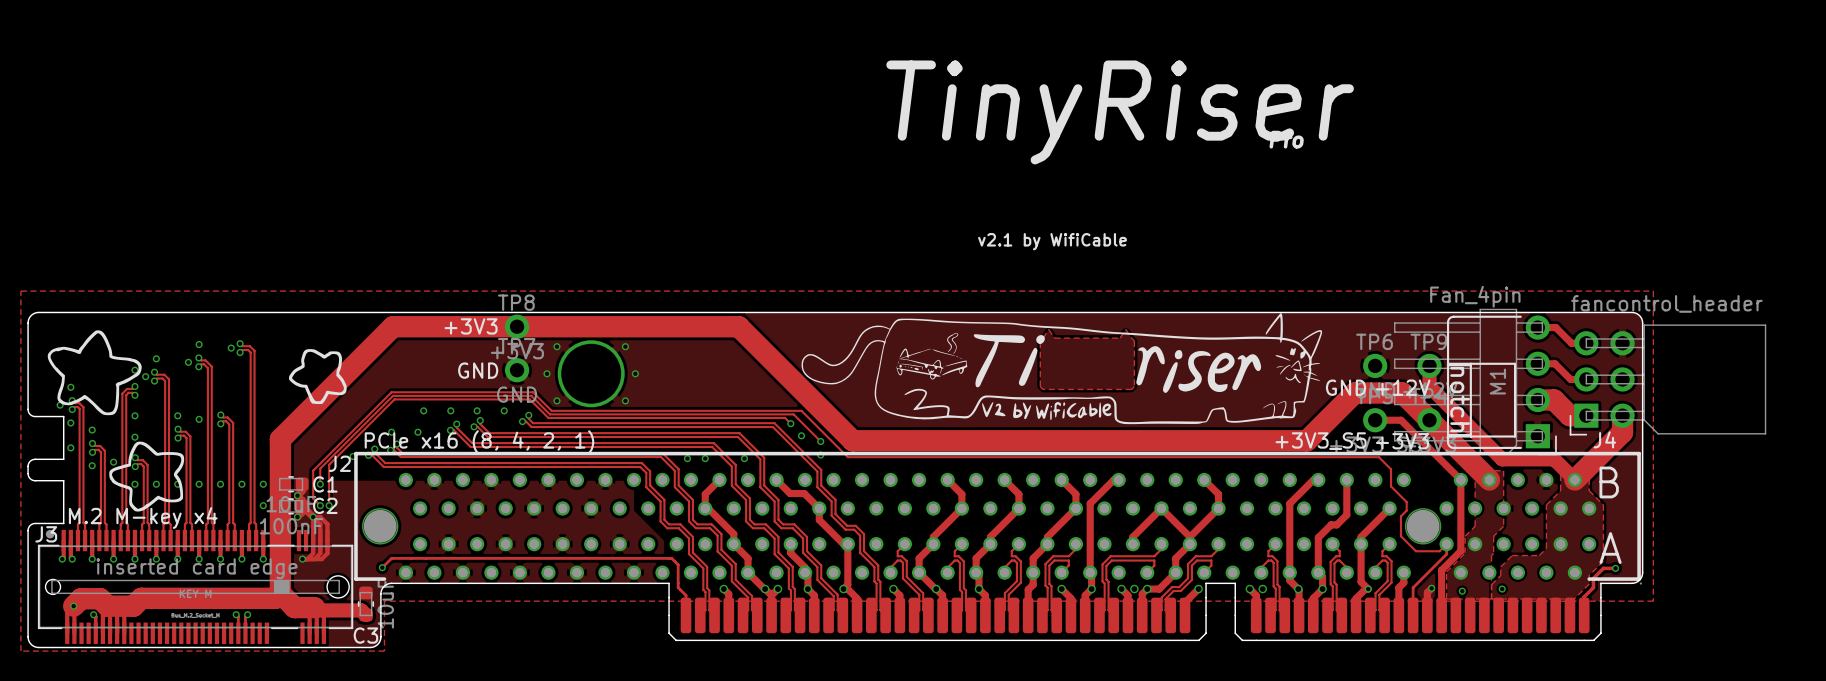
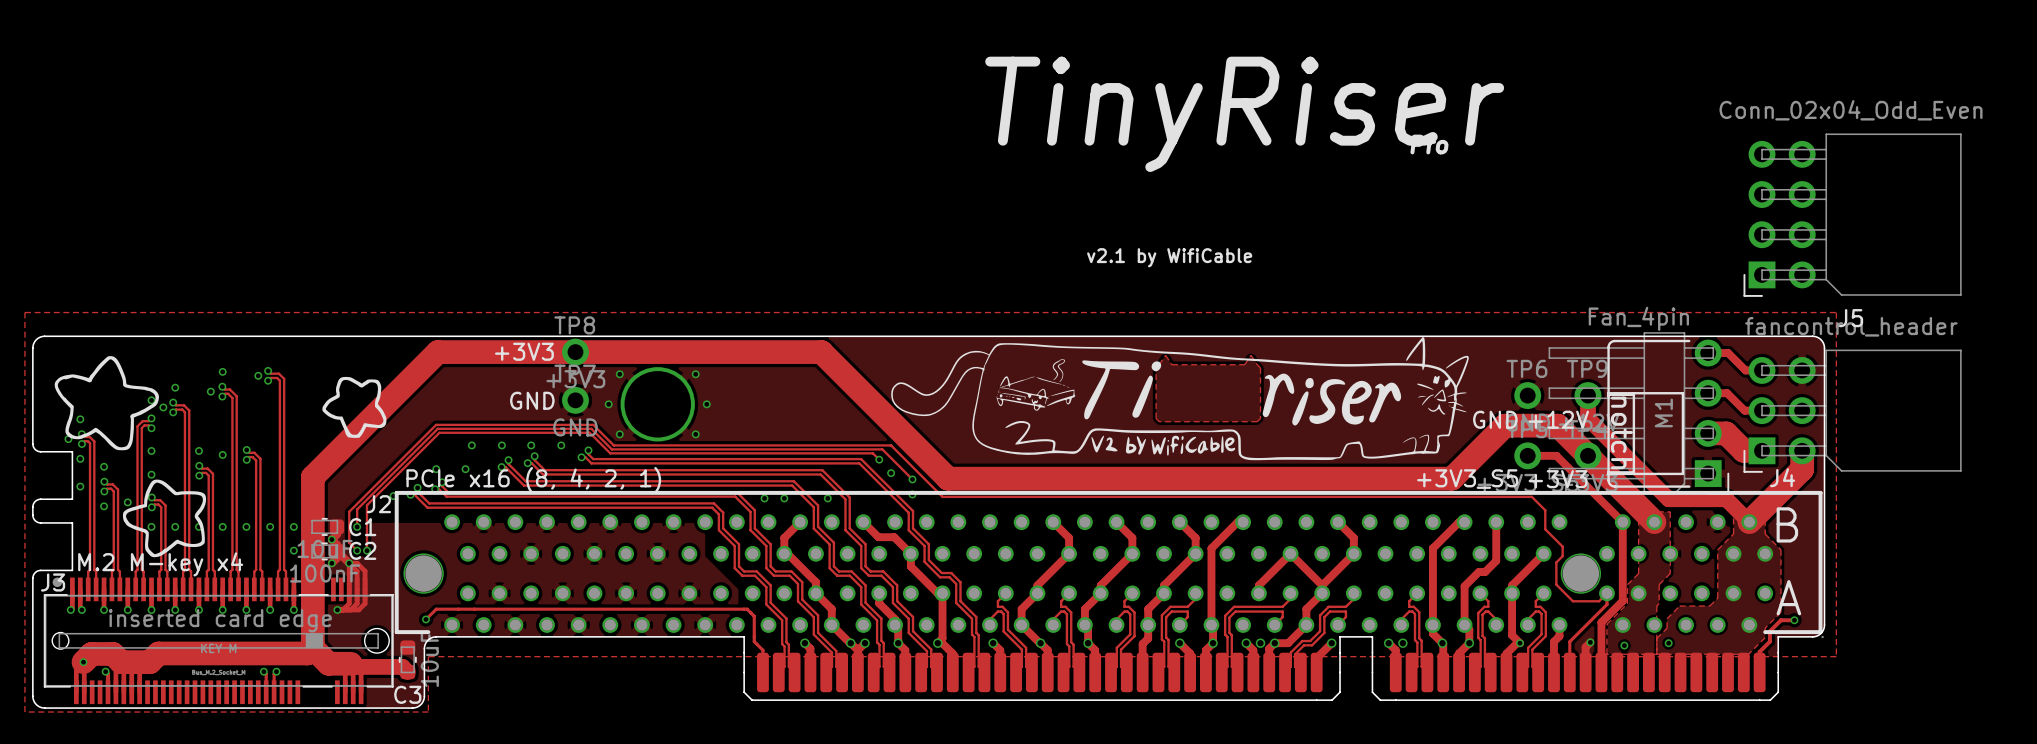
J5: none -> Conn_02x04_Odd_Even (1852, 215)

